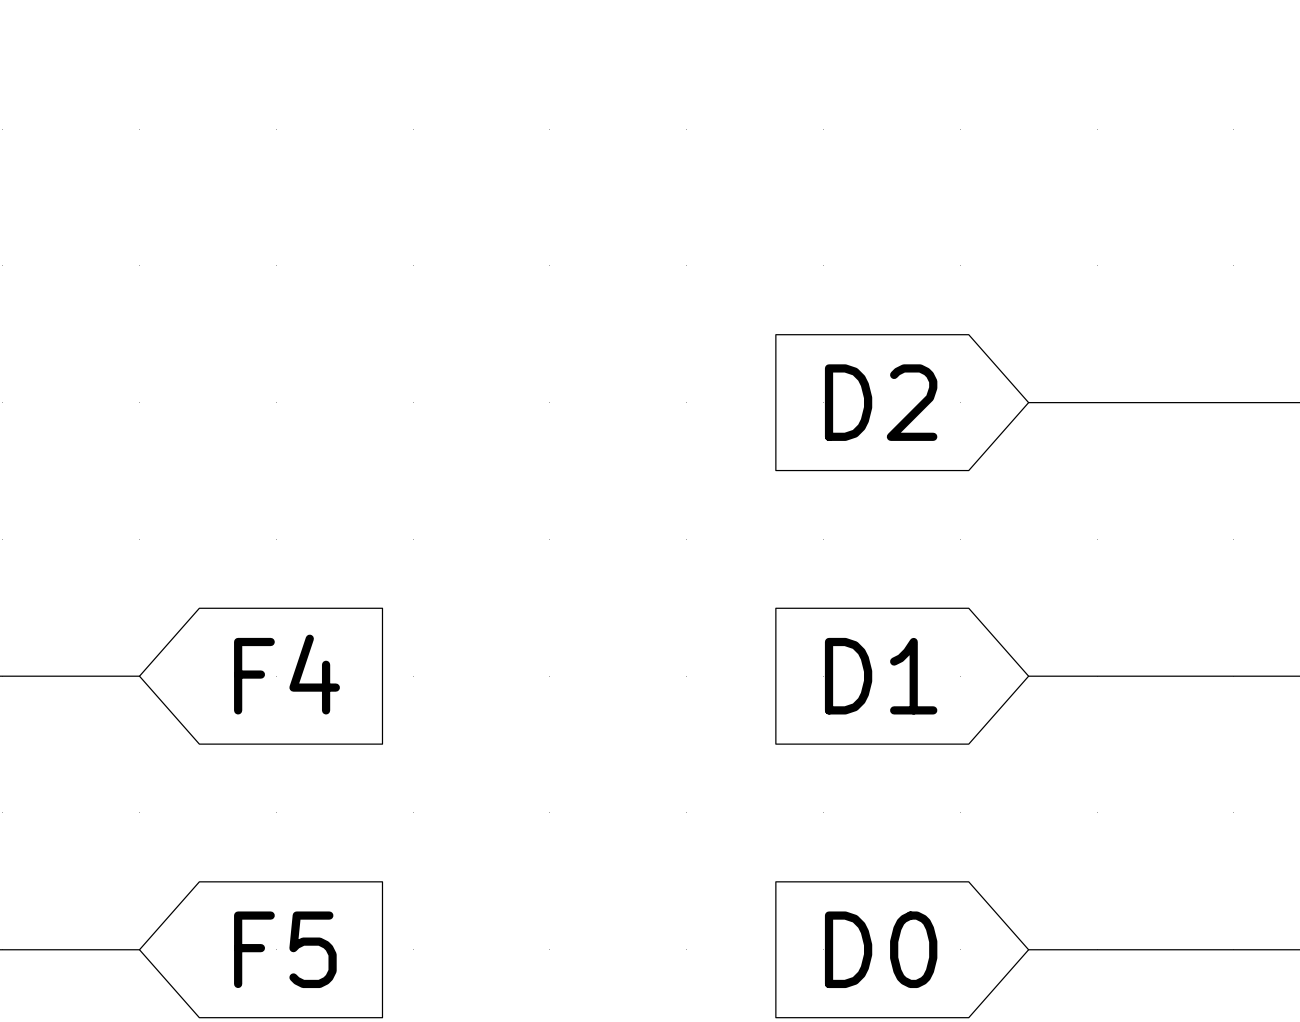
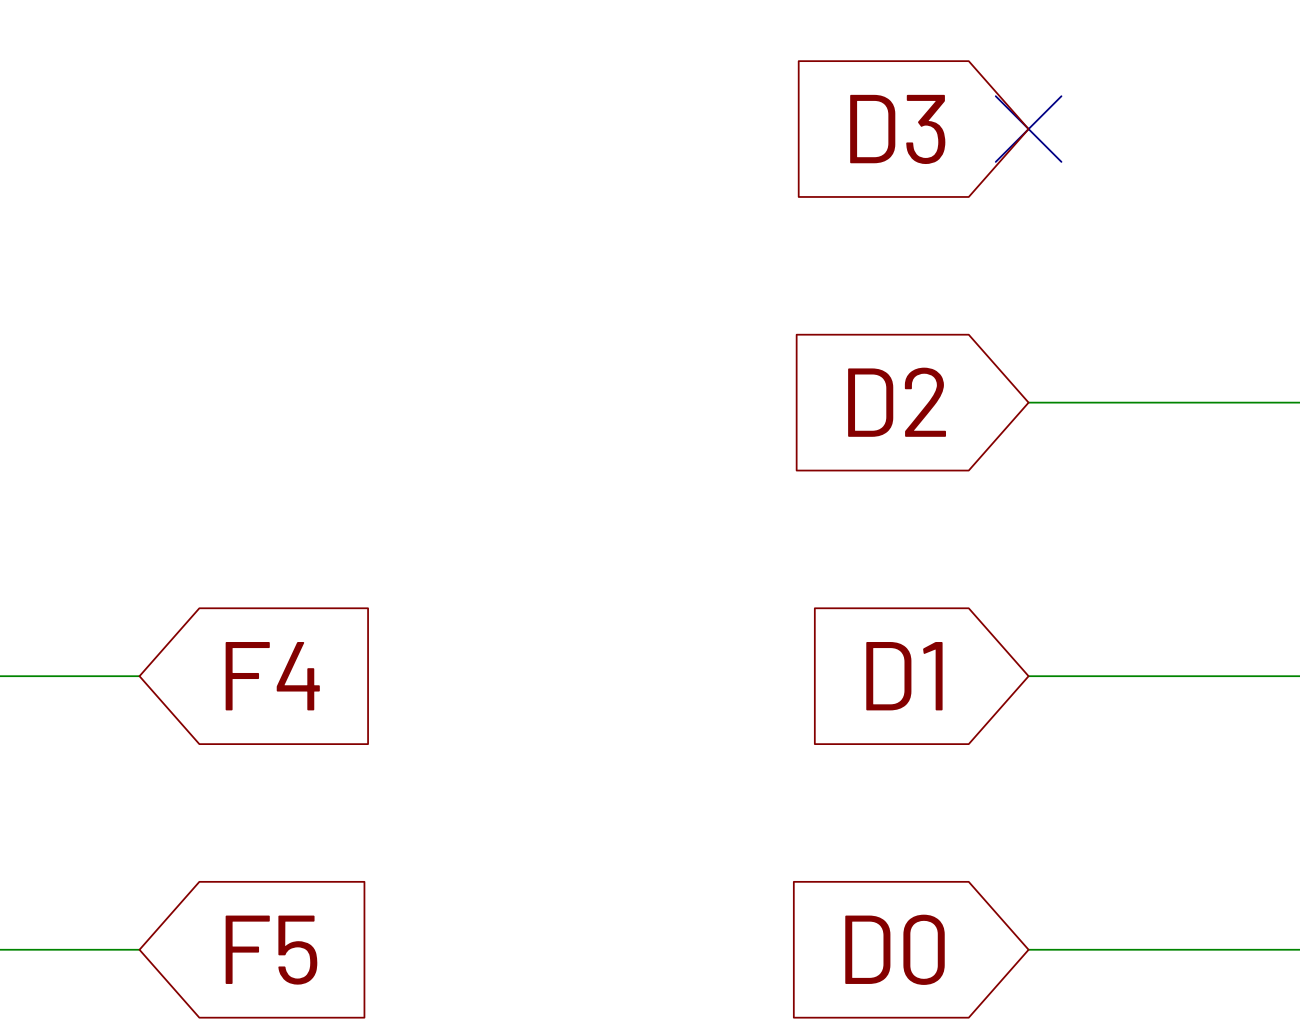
global label: none -> D3 (897, 129)
no-connect mark: none -> (1028, 129)

